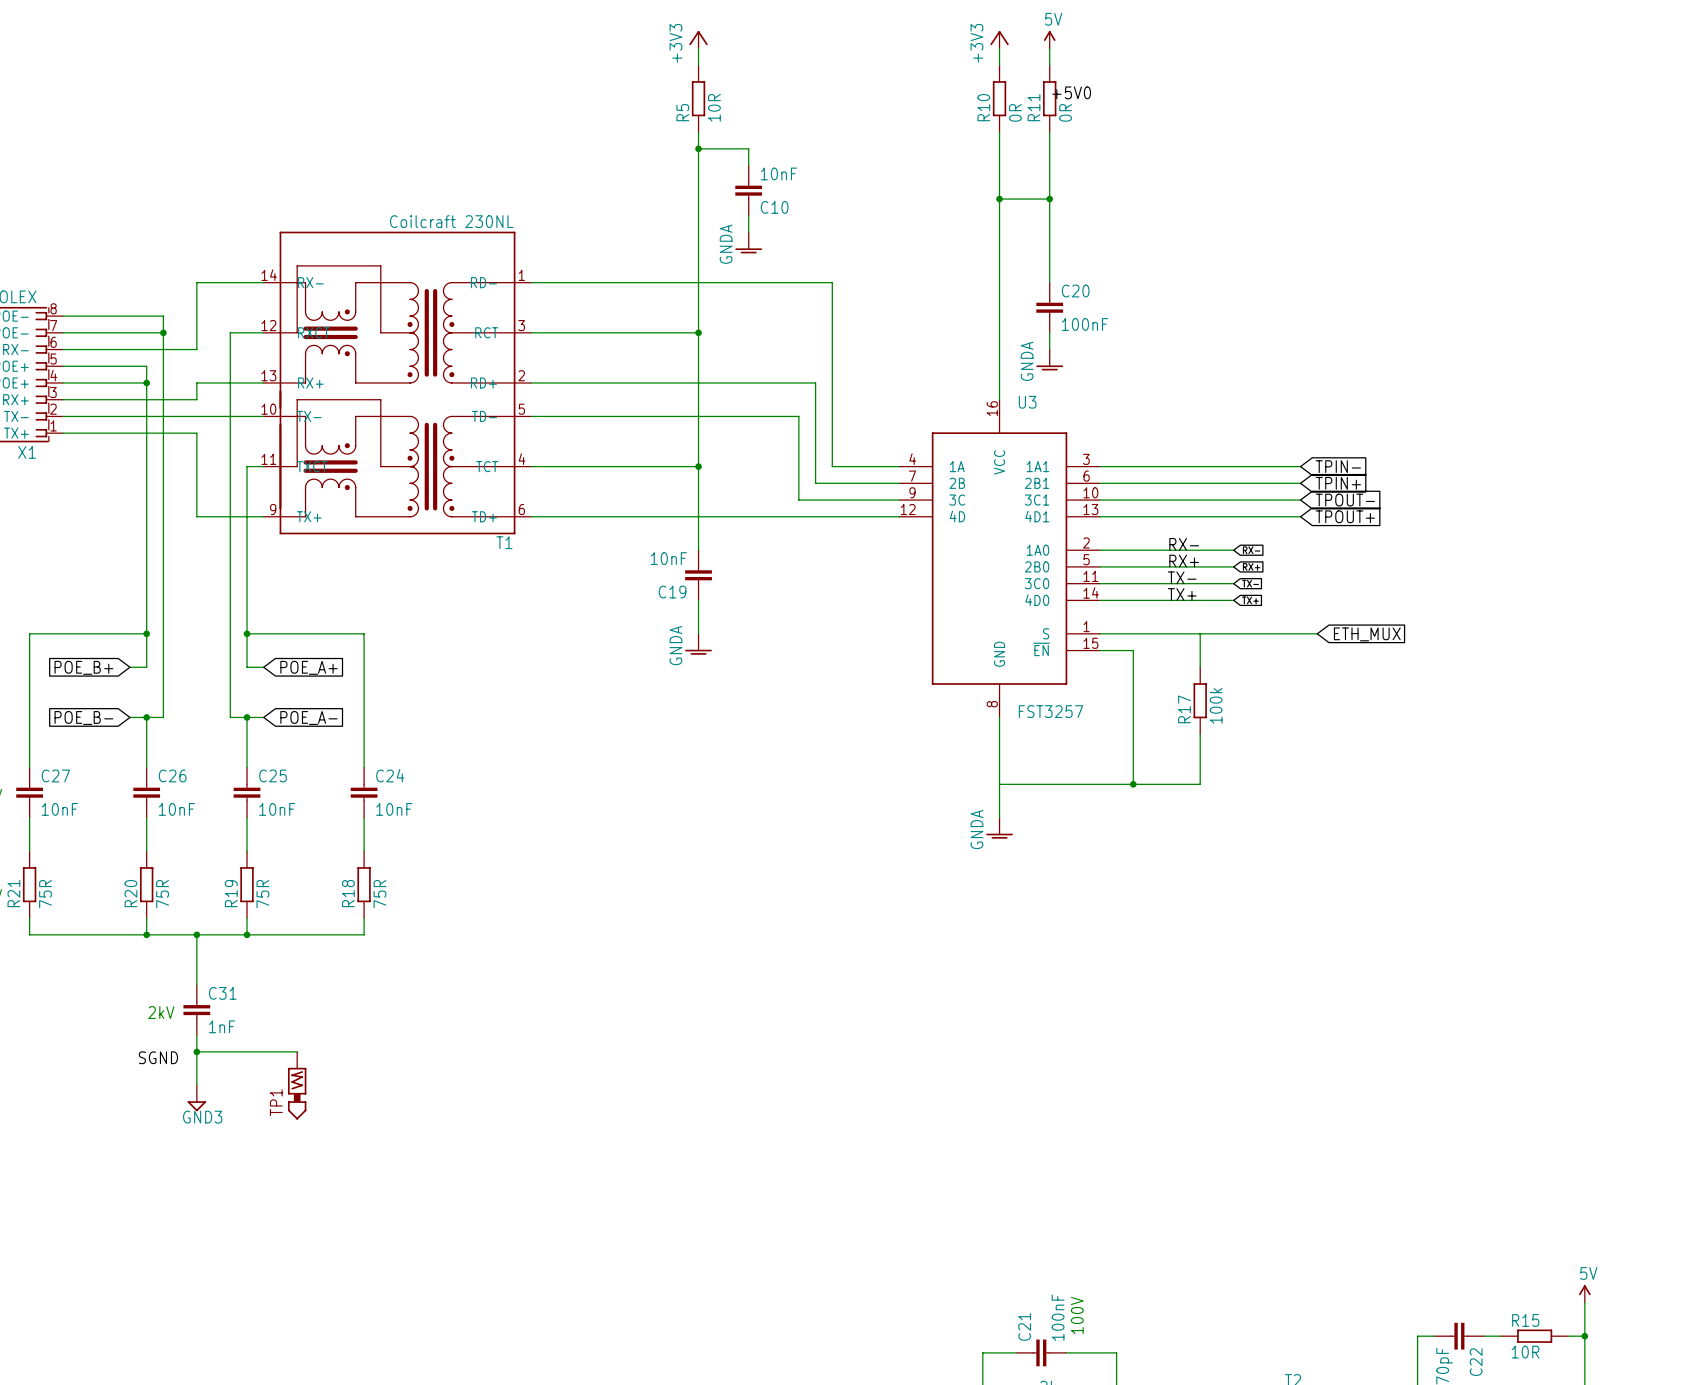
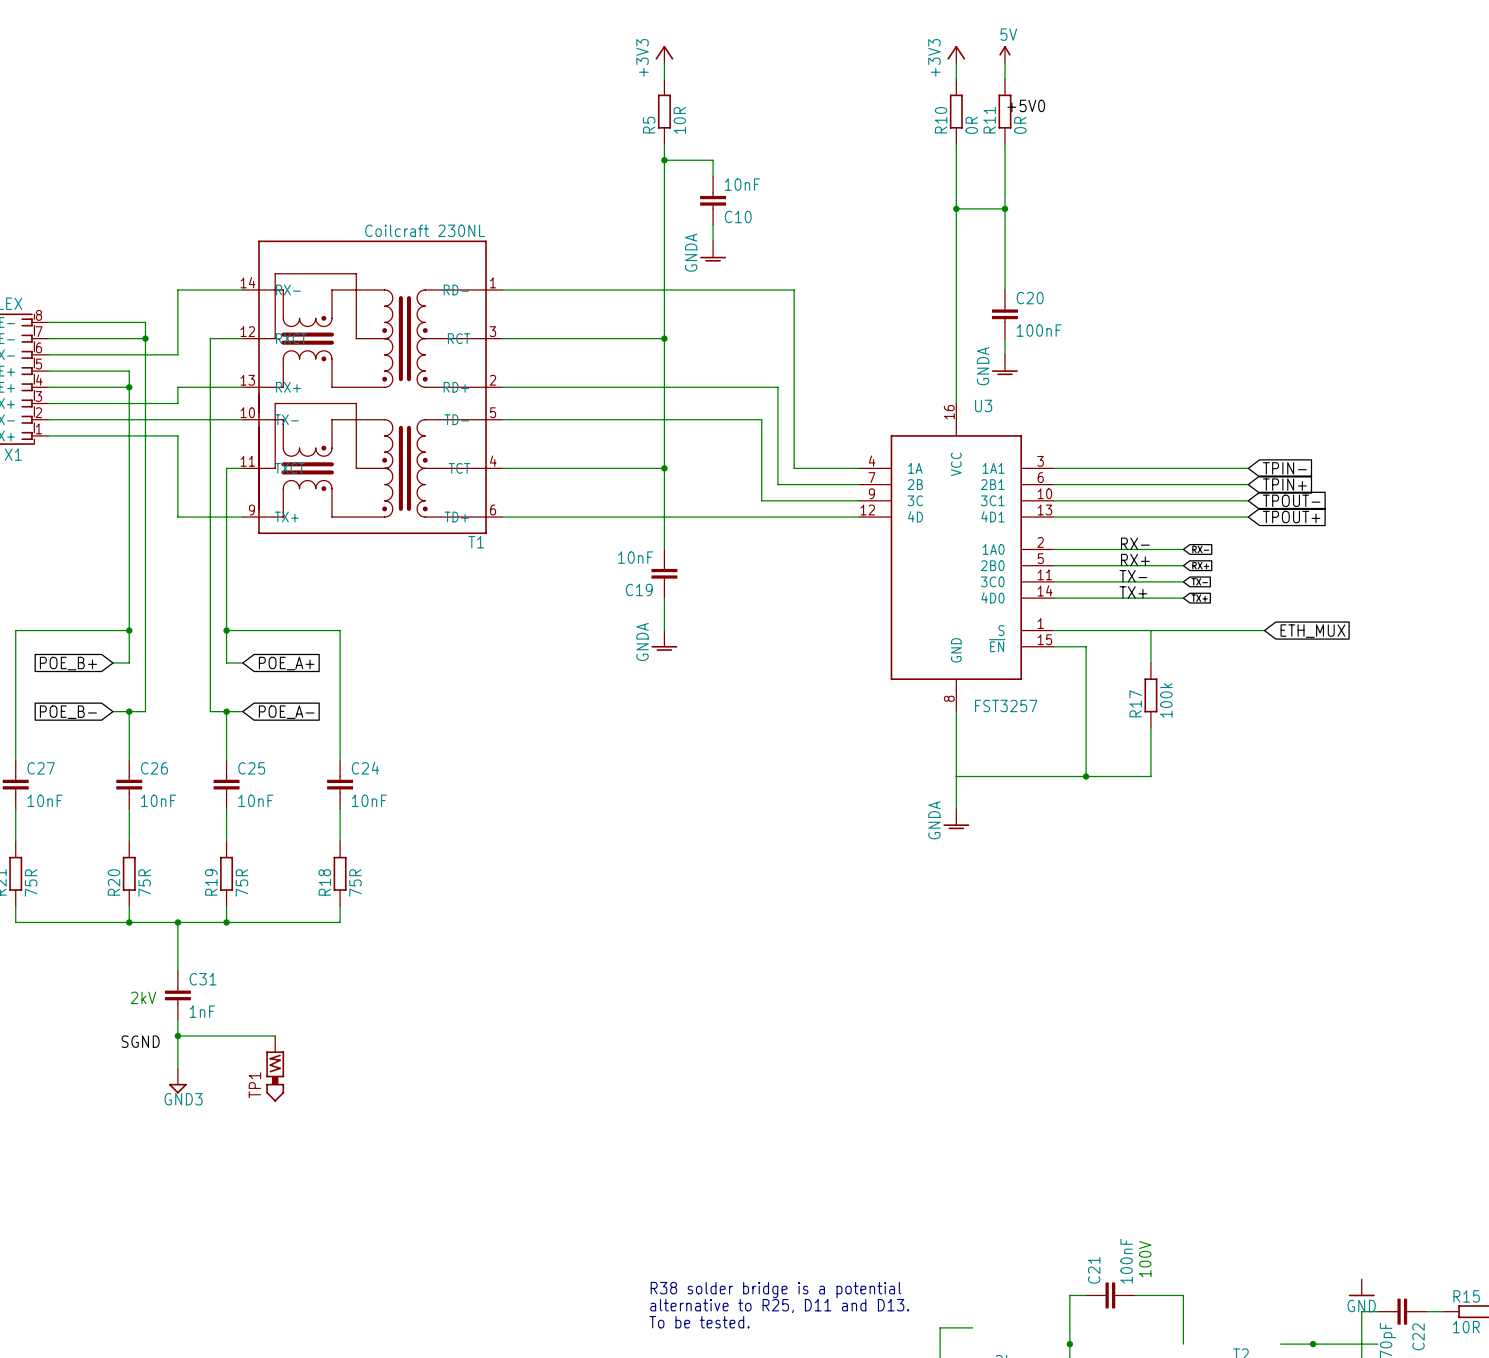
text: none -> 100V (1145, 1259)
power symbol: none -> GND (1361, 1287)
text: none -> R38 solder bridge is a potential (776, 1290)
text: 100V (1077, 1315) -> none
wire: none -> (1134, 1295) (1183, 1295) (1183, 1344)
text: none -> alternative to R25, D11 and D13. (779, 1306)
text: none -> To be tested. (699, 1322)
C21 position: (1041, 1352) -> (1110, 1295)
wire: (1066, 1352) (1116, 1352) -> (1086, 1295) (1069, 1295) (1069, 1327)
junction: none -> (1069, 1344)
wire: none -> (1280, 1344) (1377, 1344)
junction: none -> (1313, 1344)

